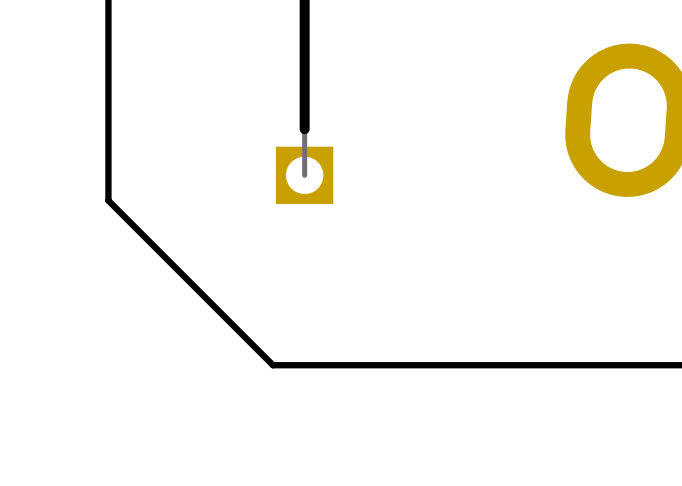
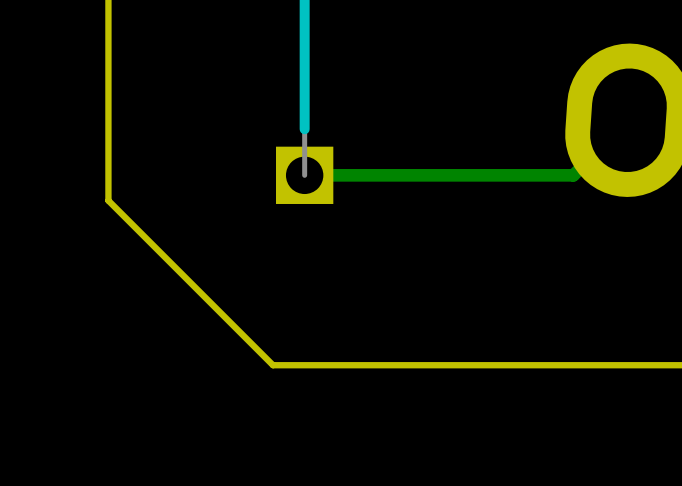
bottom track: none -> (628, 120) (573, 175) (304, 175)

